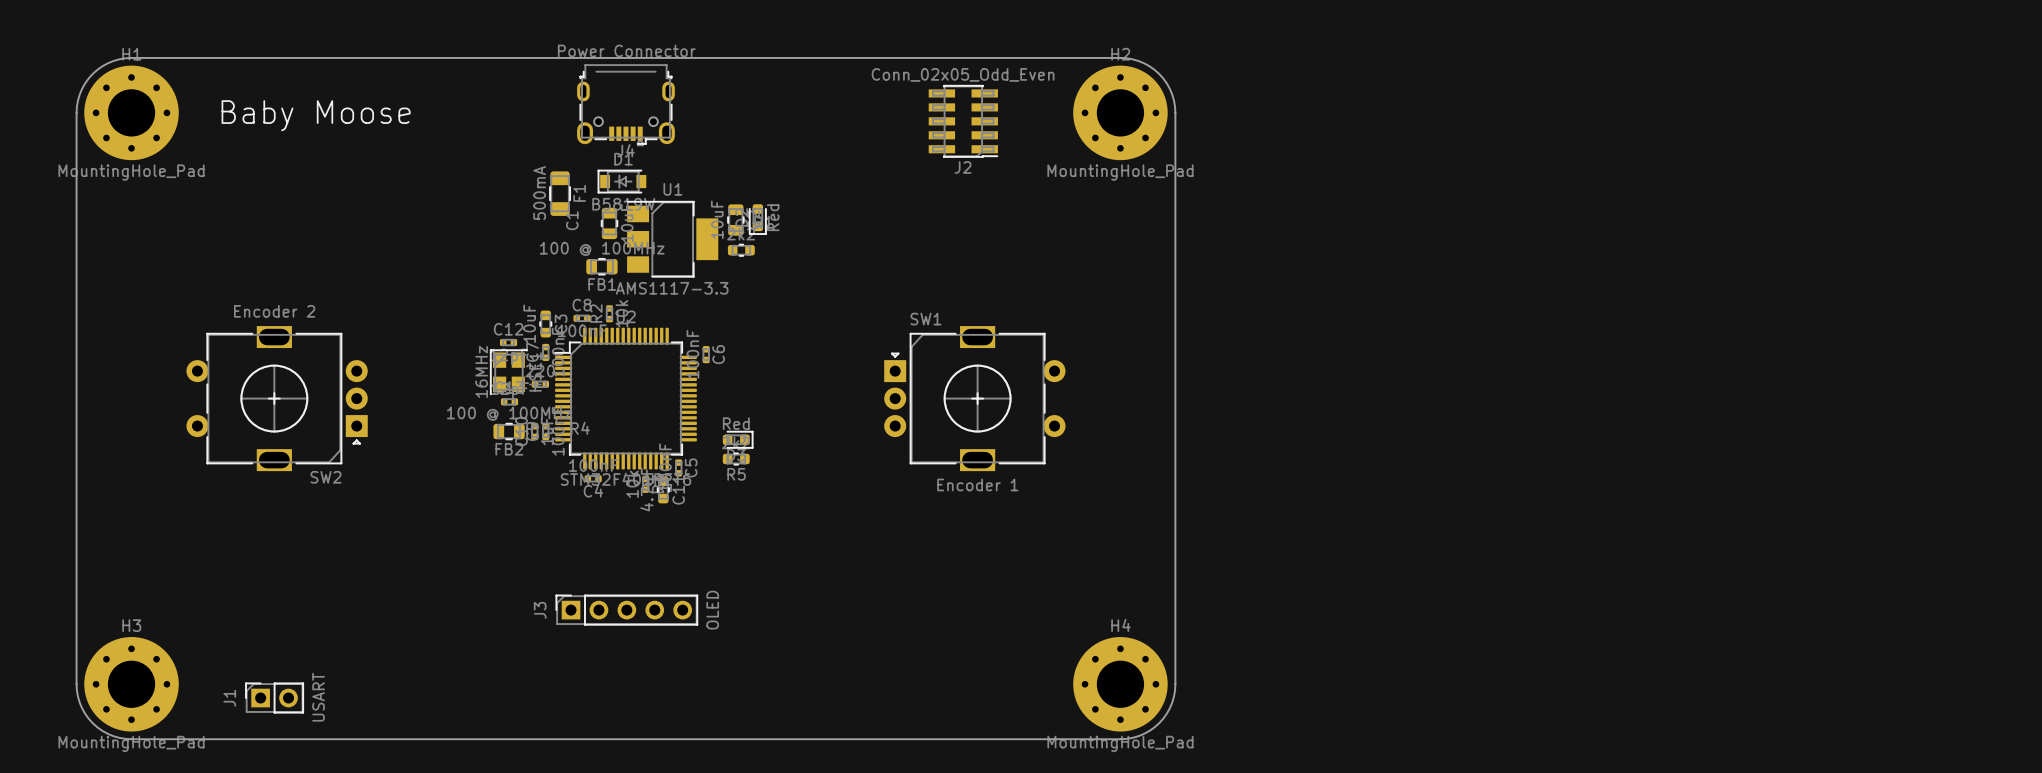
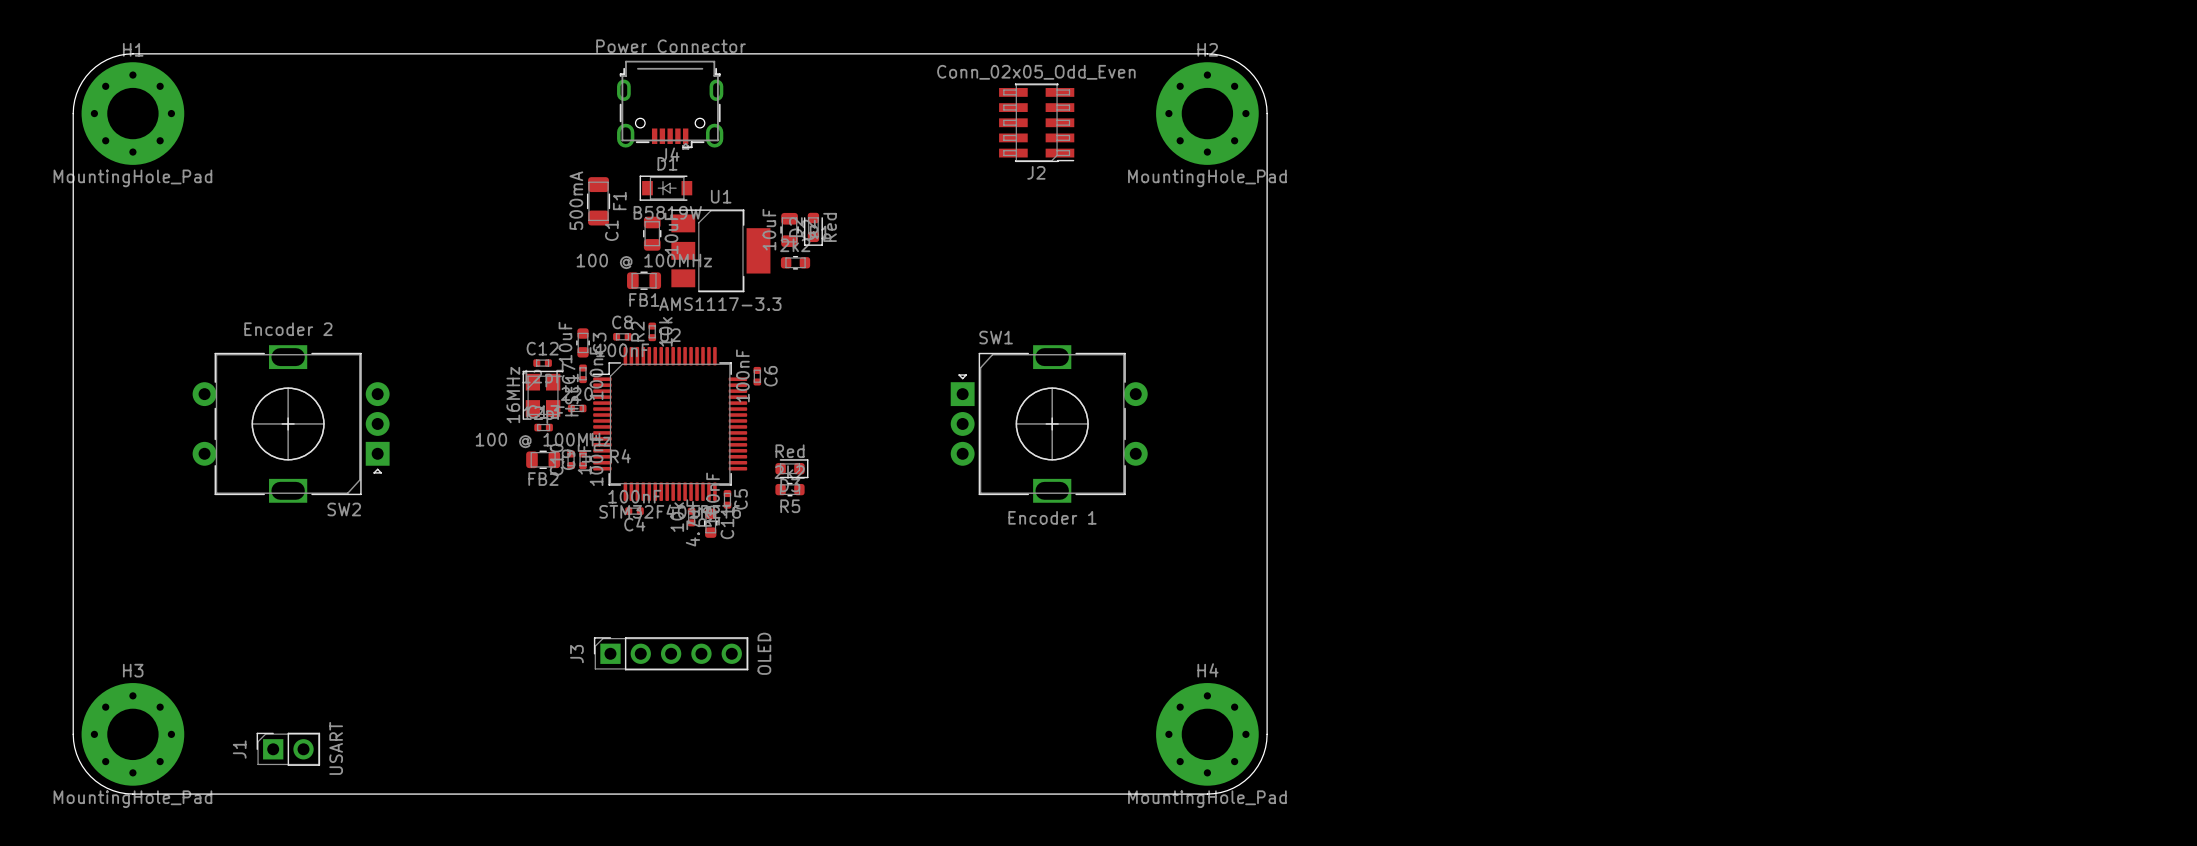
text: Baby Moose (316, 115) -> none

